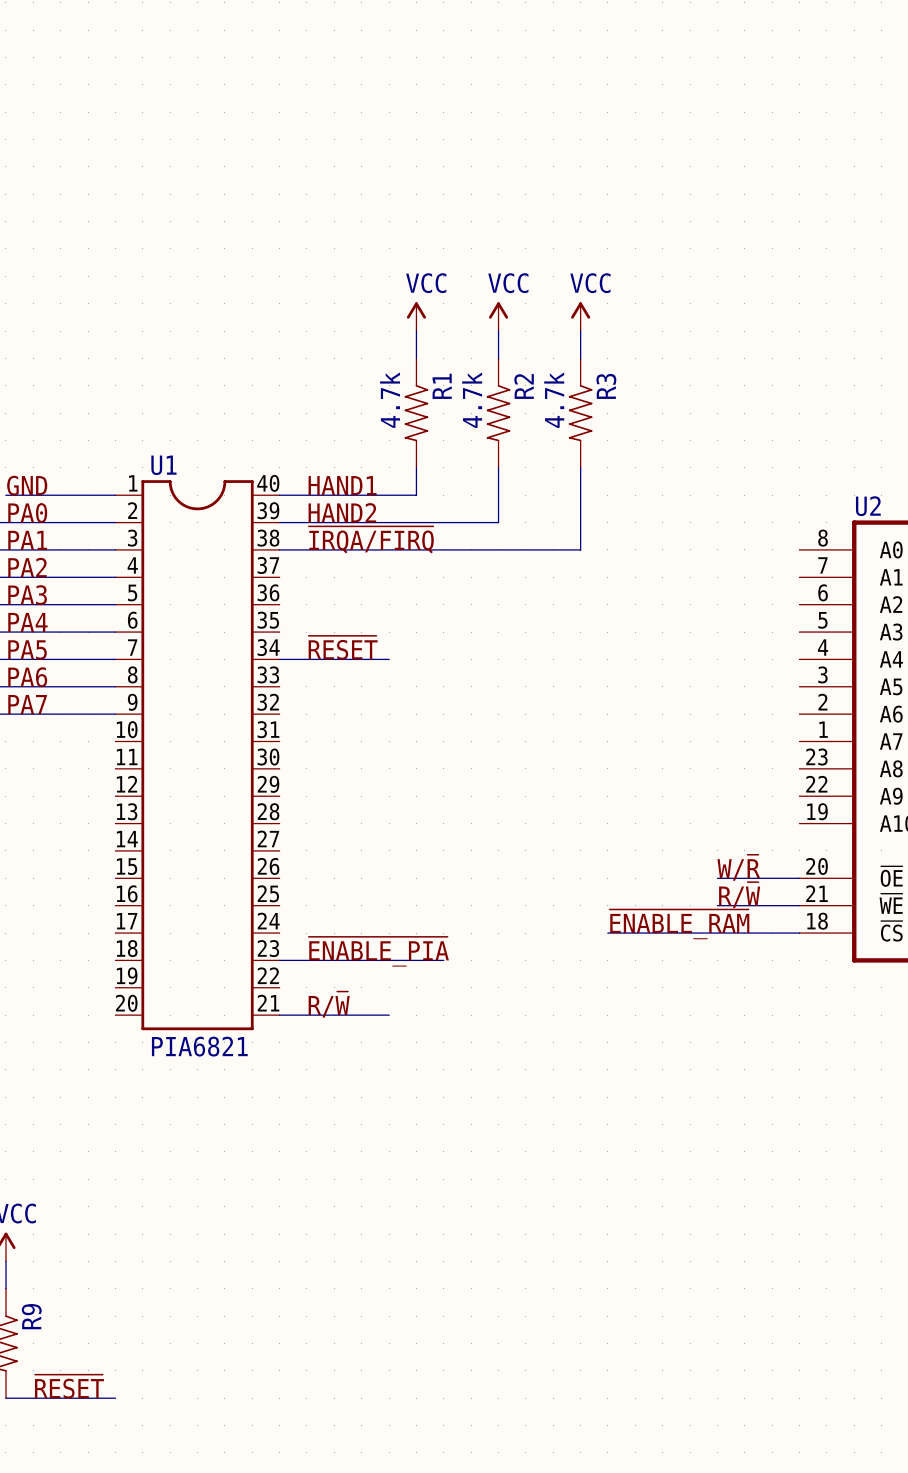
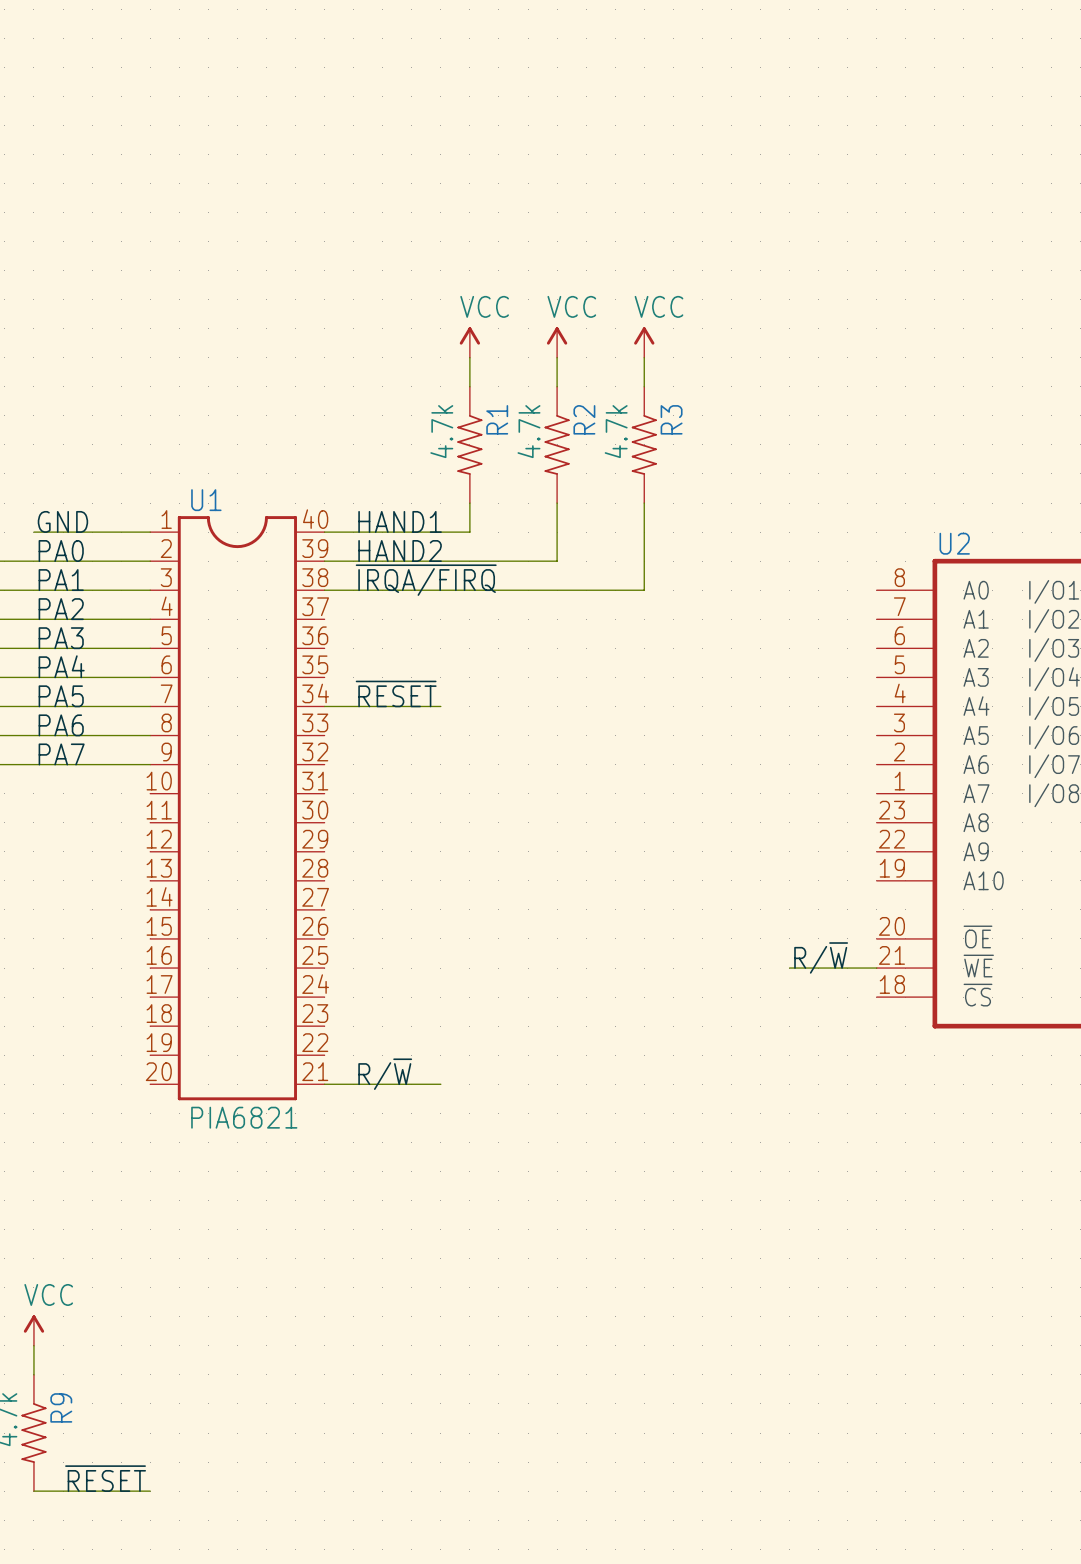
label: W/~{R} (738, 867) -> none
wire: (717, 878) (799, 878) -> none
label: ~{ENABLE_RAM} (679, 924) -> none
wire: (607, 933) (799, 933) -> none
label: ~{ENABLE_PIA} (378, 951) -> none
wire: (279, 960) (443, 960) -> none

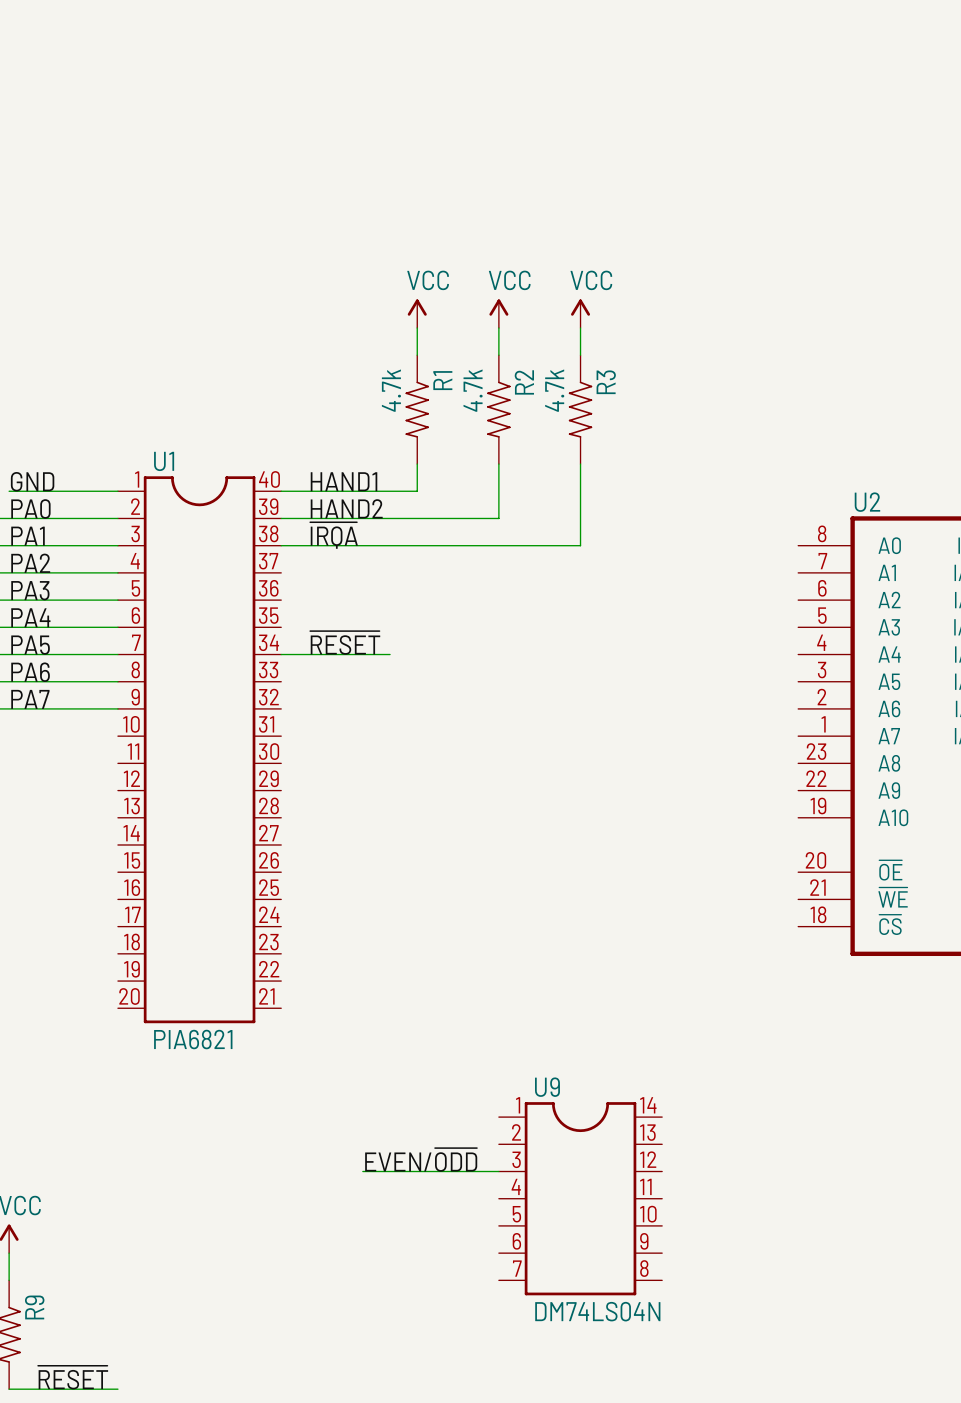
label: ~{IRQA/FIRQ} (426, 580) -> ~{IRQA} (334, 535)
label: R/~{W} (821, 957) -> none
wire: (789, 968) (876, 968) -> none
label: R/~{W} (385, 1074) -> none
wire: (324, 1084) (440, 1084) -> none
label: none -> EVEN/~{ODD} (421, 1159)
wire: none -> (362, 1171) (498, 1171)
U9: none -> DM74LS04N (580, 1198)

